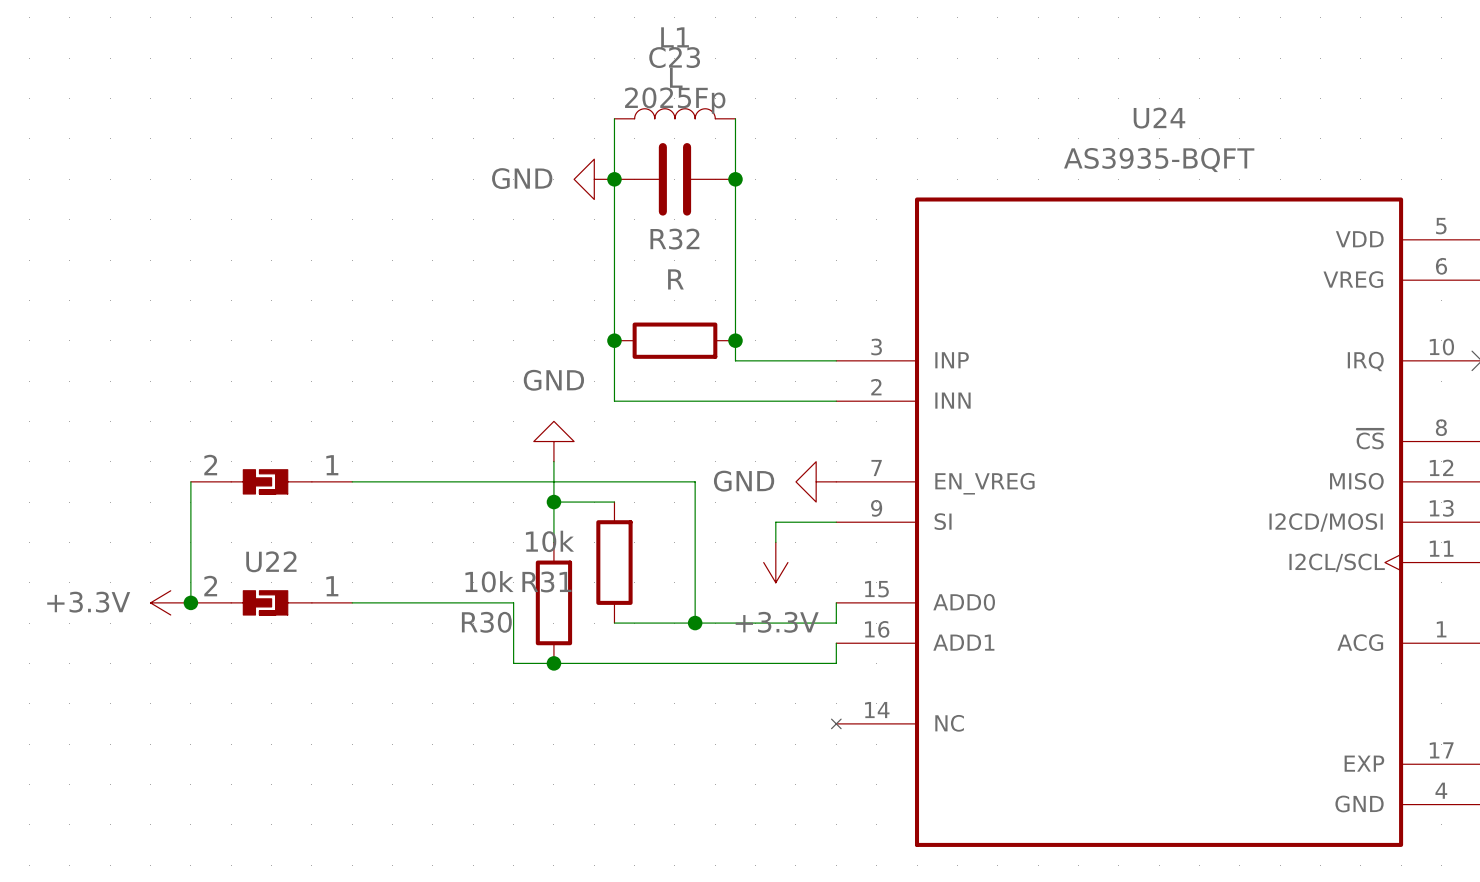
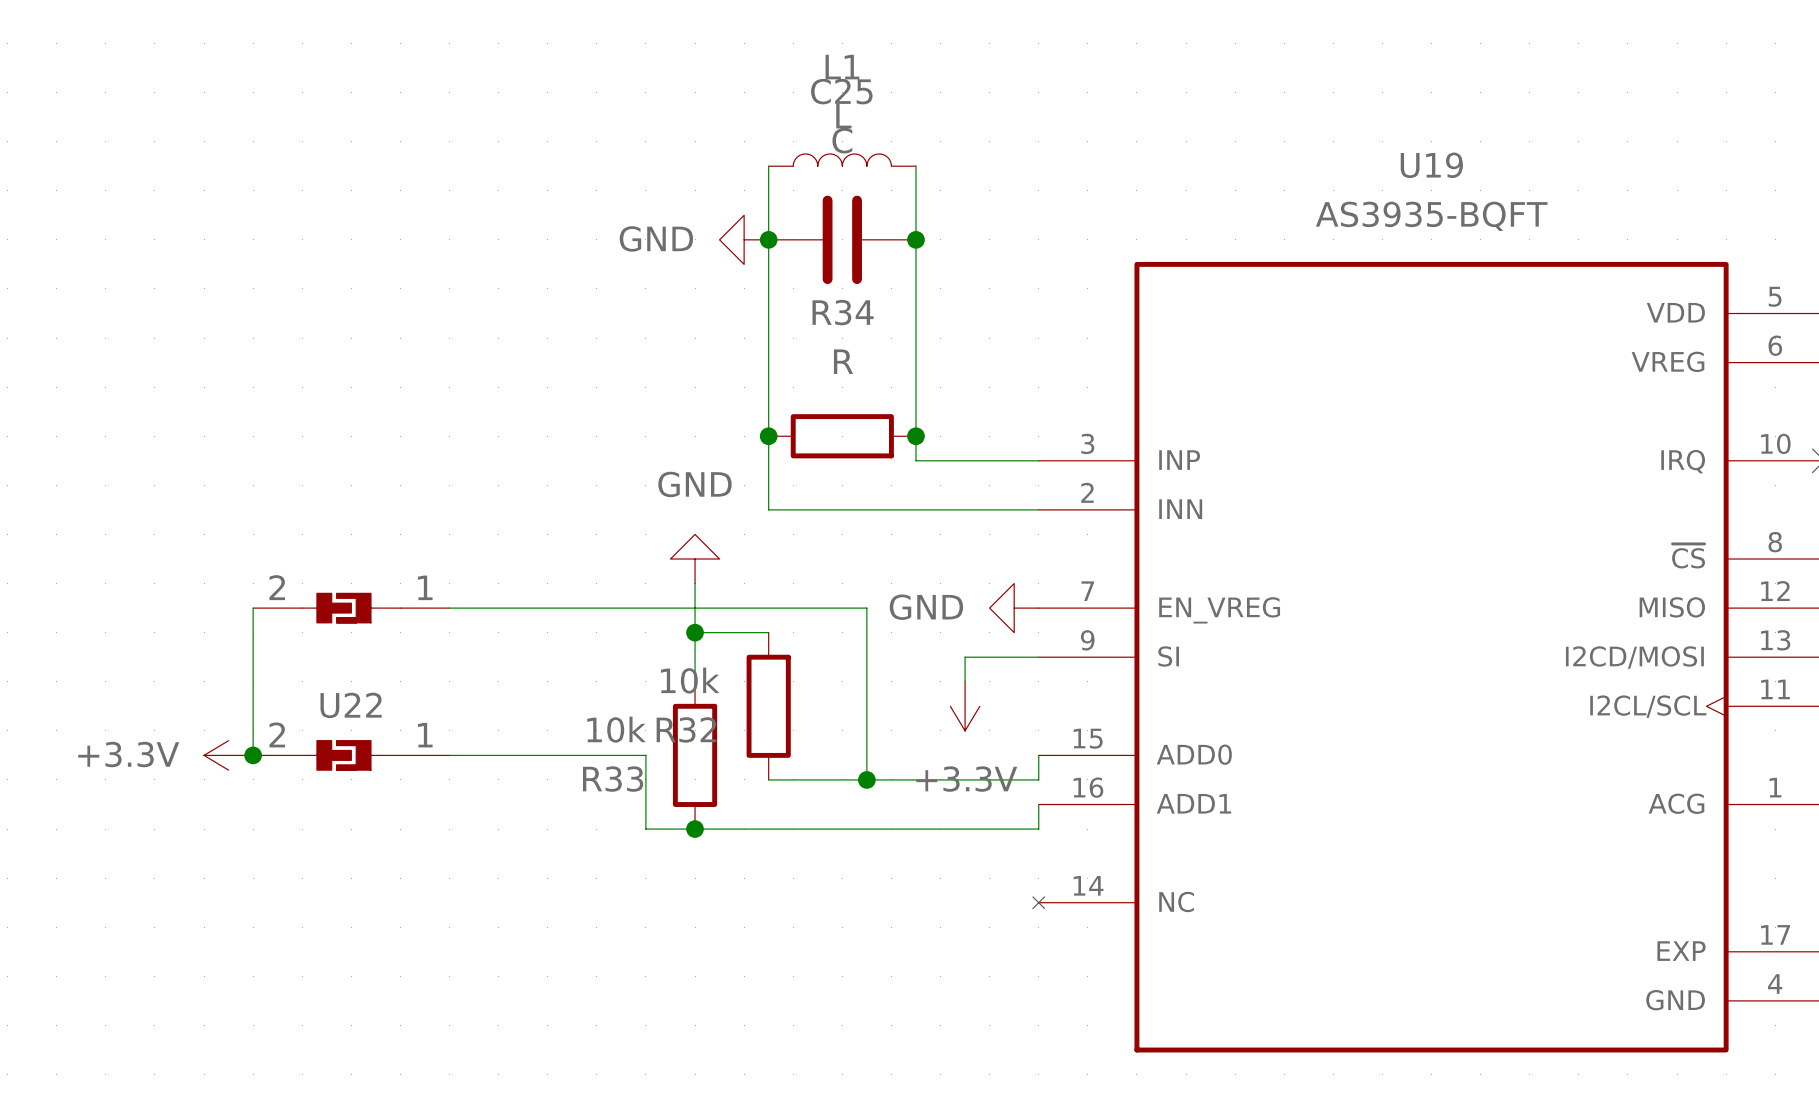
C23 name: C23 (674, 57) -> C25 (841, 91)
C23 value: 2025Fp (675, 100) -> C (842, 140)
U24 name: U24 (1159, 118) -> U19 (1431, 165)
R32 name: R32 (674, 239) -> R34 (843, 312)
R31 name: R31 (546, 581) -> R32 (686, 729)
R30 name: R30 (486, 622) -> R33 (613, 779)

